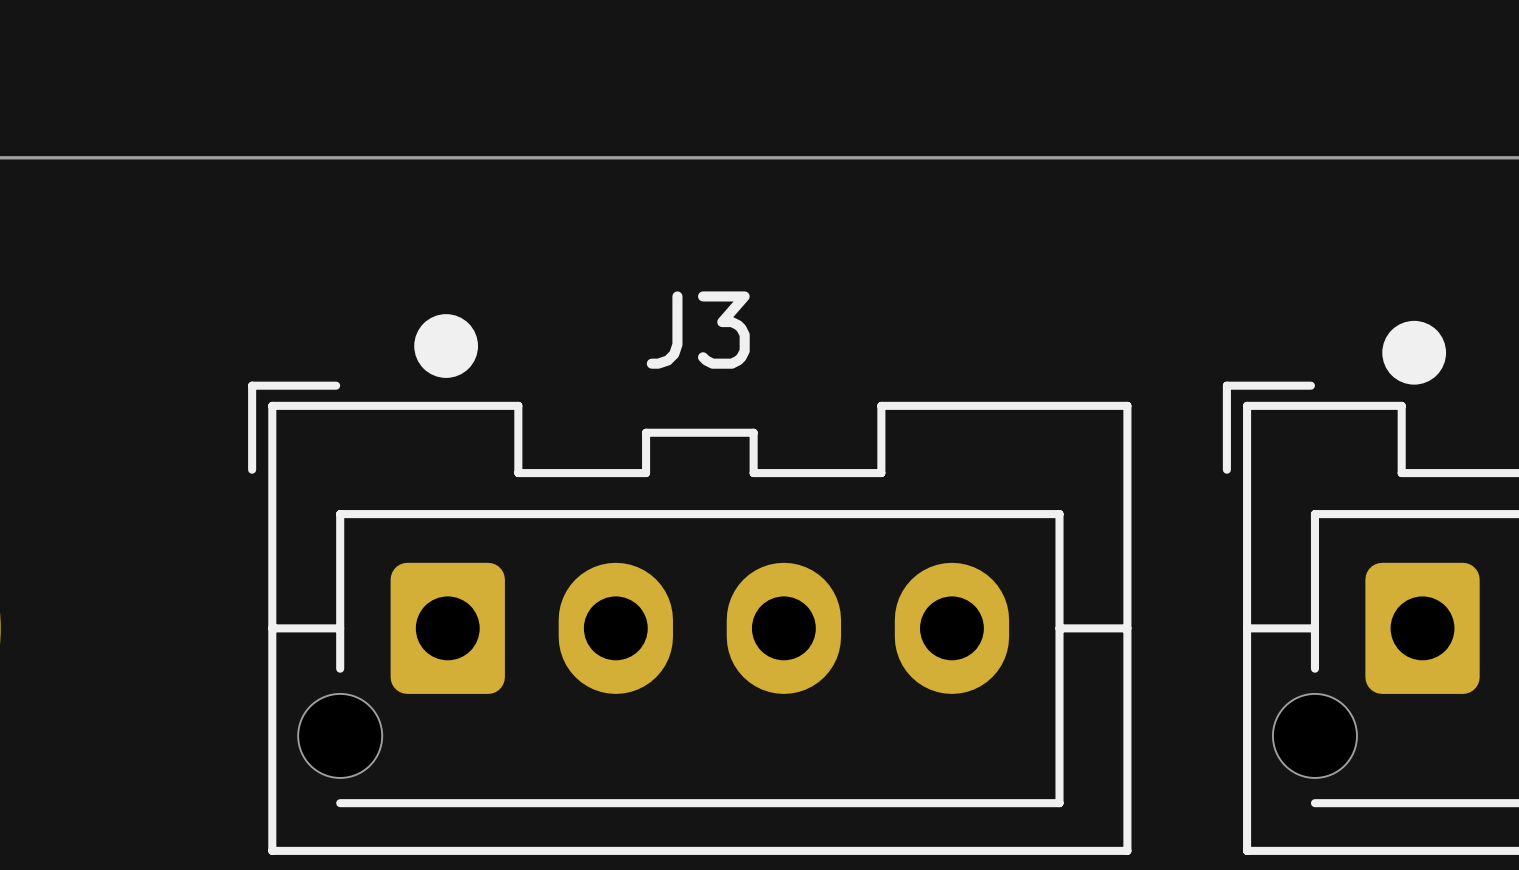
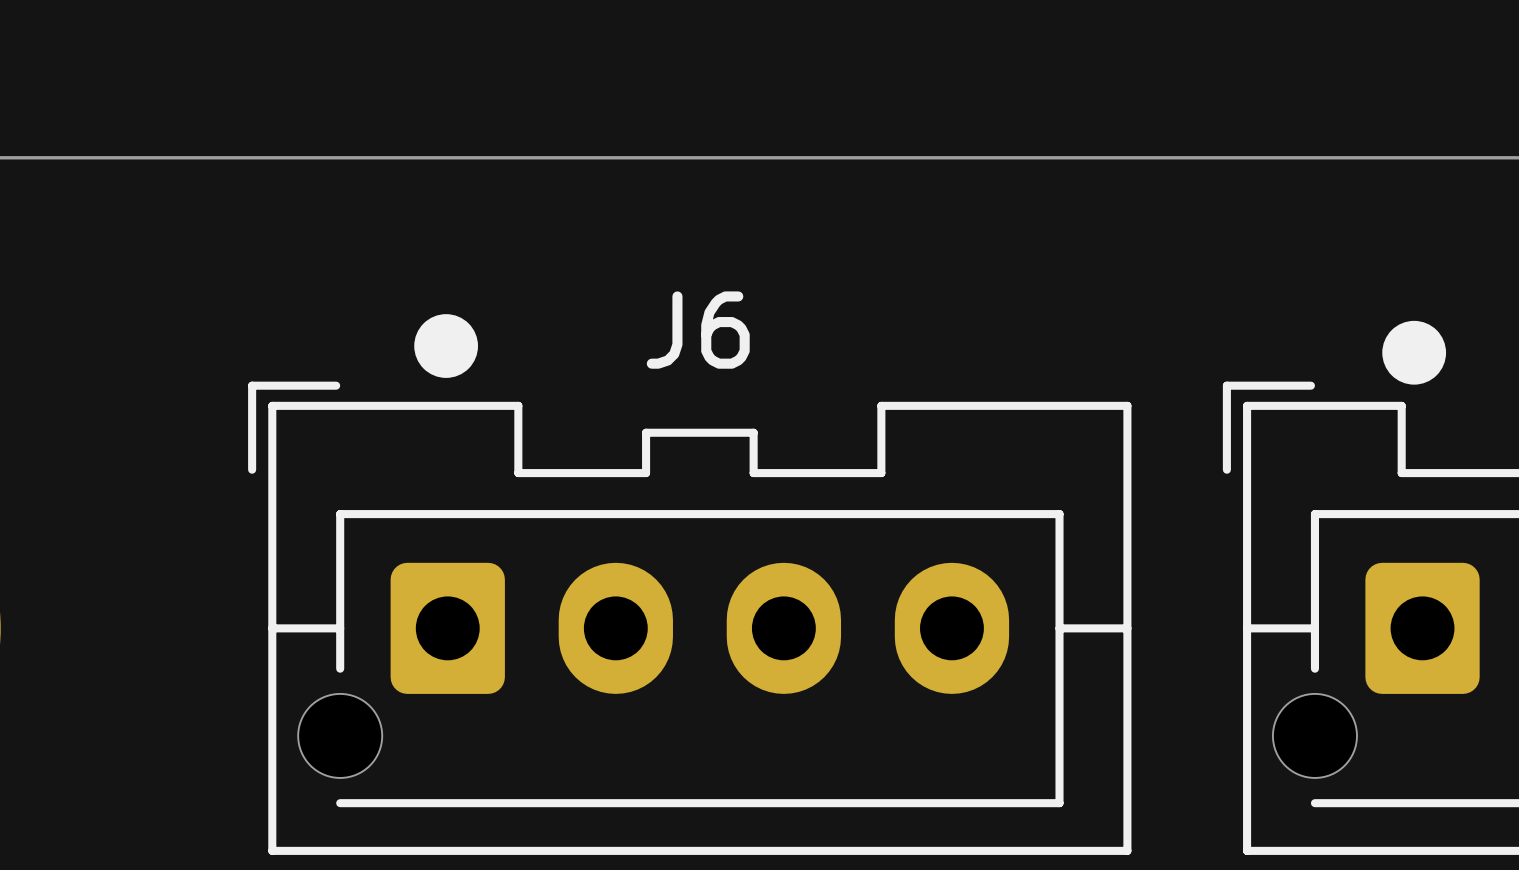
J3 name: J3 (698, 330) -> J6 (698, 330)

